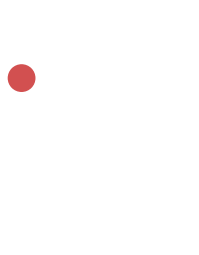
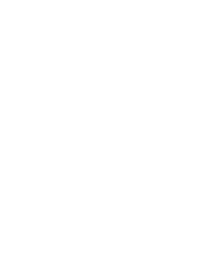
part: (21, 78) -> none

